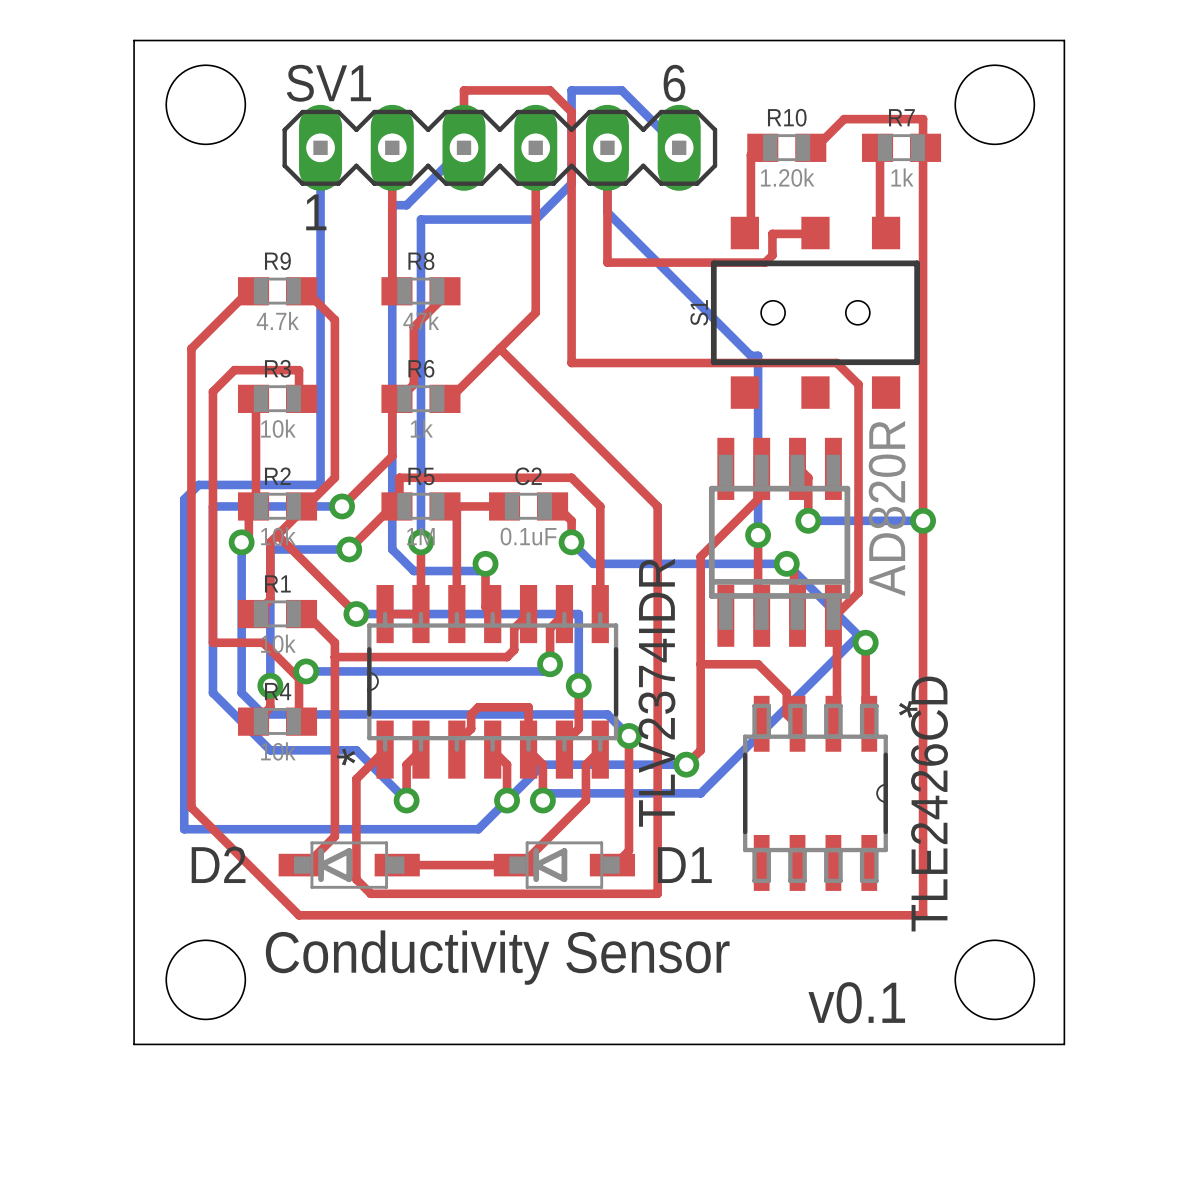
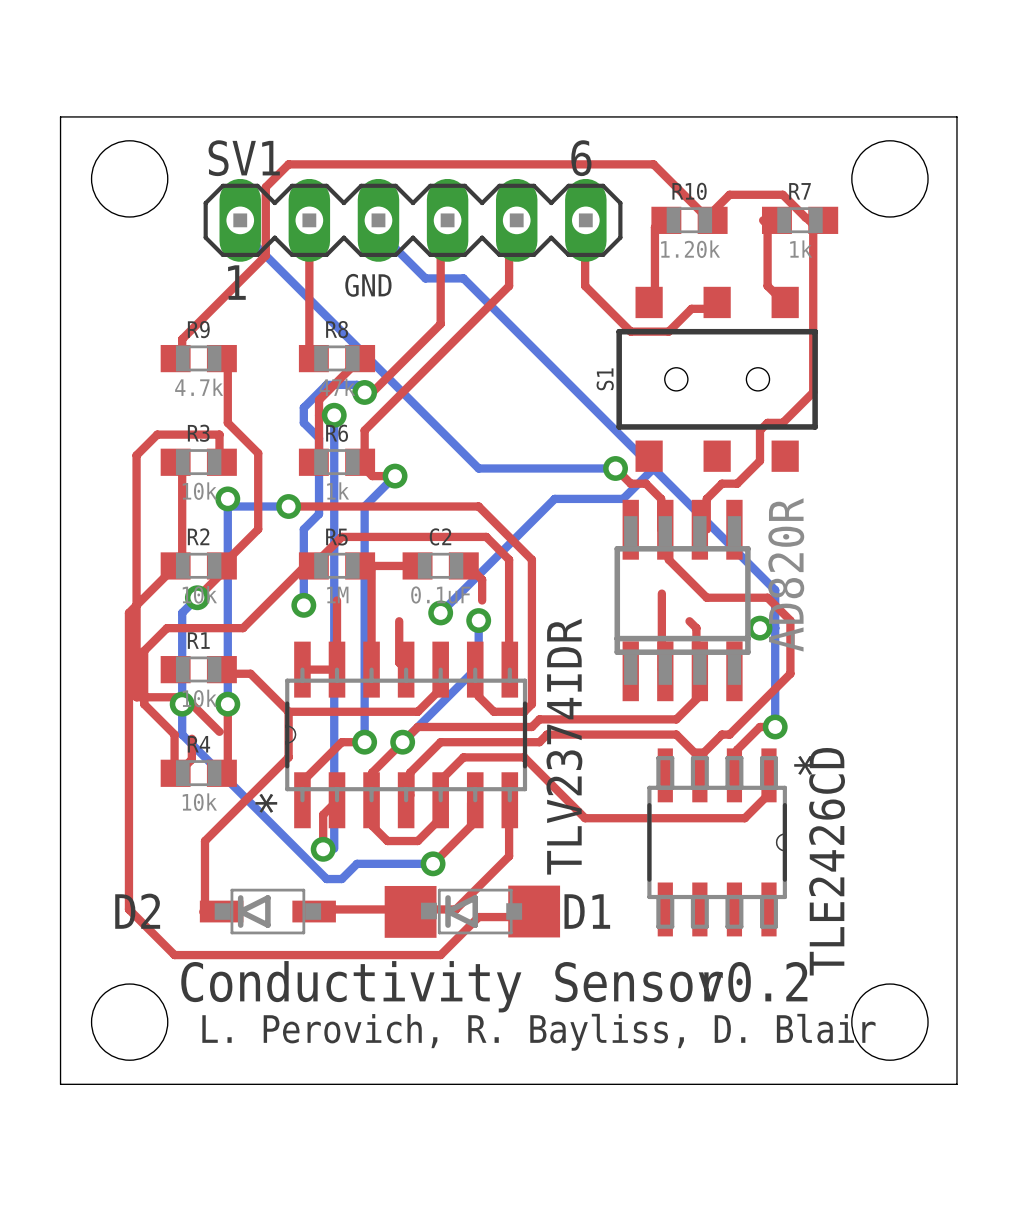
bottom track: none -> (233, 220) (235, 225) (478, 468) (615, 468)
bottom track: (320, 147) (320, 484) (198, 484) (184, 499) (184, 829) (478, 829) (542, 764) (686, 764) -> none
bottom track: none -> (371, 220) (372, 225) (425, 278) (463, 278) (775, 590) (775, 726)
top track: (464, 147) (464, 90) (550, 90) (571, 111) (571, 363) (836, 363) (858, 384) (858, 592) (833, 615) (836, 621) (836, 721) (833, 723) -> (775, 726) (760, 726) (737, 749) (737, 772) (734, 775)
bottom track: (464, 147) (406, 205) (392, 205) (392, 549) (413, 571) (478, 571) (485, 563) -> none
top track: none -> (440, 220) (440, 324) (372, 392) (364, 392)
top track: (535, 147) (535, 312) (449, 398) (444, 398) -> none
top track: none -> (509, 220) (509, 286) (364, 430) (364, 460) (360, 462) (372, 476) (395, 476)
top track: (607, 147) (607, 262) (765, 262) (772, 255) (772, 233) (815, 233) -> (578, 220) (585, 225) (585, 286) (630, 331) (668, 331) (691, 308) (714, 308) (717, 302)
bottom track: (607, 147) (607, 212) (750, 355) (758, 355) (758, 535) -> none
bottom track: (679, 147) (621, 90) (571, 90) (571, 183) (535, 219) (420, 219) (420, 542) -> none
top track: (810, 147) (815, 147) (844, 119) (923, 119) (923, 915) (299, 915) (191, 807) (191, 348) (248, 291) (253, 291) -> (706, 217) (653, 164) (288, 164) (265, 187) (265, 255) (182, 339) (182, 354) (175, 358)
top track: (877, 147) (880, 147) (880, 226) (886, 233) -> (763, 220) (767, 225) (767, 286) (785, 302)
text: none -> GND (368, 285)
top track: (301, 291) (306, 291) (334, 319) (334, 477) (306, 506) (299, 506) (299, 513) (270, 542) (270, 599) (256, 614) (253, 614) -> (221, 358) (227, 362) (227, 422) (258, 453) (258, 529) (221, 565) (227, 567) (197, 597)
top track: (444, 291) (442, 291) (442, 298) (413, 327) (413, 384) (399, 398) (392, 398) (392, 456) (342, 506) -> (360, 358) (319, 400) (319, 460) (313, 462)
bottom track: none -> (364, 392) (357, 384) (326, 384) (303, 407) (303, 422) (319, 438) (319, 514) (303, 529) (303, 605)
via: none -> (364, 392)
top track: (499, 348) (657, 506) (657, 893) (370, 893) (356, 879) (356, 779) (385, 749) -> (364, 742) (341, 742) (303, 780) (302, 800)
bottom track: none -> (334, 415) (334, 848)
via: none -> (334, 415)
top track: (253, 398) (256, 398) (256, 506) (248, 506) (248, 535) (241, 542) -> (175, 462) (182, 468) (182, 559) (128, 612) (128, 909) (174, 955) (440, 955) (478, 917) (531, 917) (534, 911)
top track: none -> (615, 468) (630, 483) (645, 483) (661, 498) (661, 529) (665, 529) (668, 536) (668, 559) (706, 597) (767, 597) (790, 620) (790, 673) (729, 734) (721, 734) (699, 757)
via: none -> (615, 468)
bottom track: none -> (653, 468) (623, 498) (554, 498) (440, 612)
bottom track: none -> (395, 476) (364, 506) (364, 742)
via: none -> (395, 476)
bottom track: none -> (227, 498) (227, 704)
via: none -> (227, 498)
bottom track: none -> (227, 506) (288, 506)
via: none -> (288, 506)
top track: (761, 468) (758, 470) (758, 499) (700, 556) (700, 750) (686, 764) -> none
top track: (797, 468) (808, 477) (808, 520) -> (699, 529) (706, 529) (706, 498) (721, 483) (737, 483) (760, 460) (760, 430) (767, 422) (782, 422) (813, 392) (813, 225) (782, 194) (729, 194) (706, 217)
bottom track: (342, 506) (212, 506) (212, 692) (270, 750) (356, 750) (406, 800) -> none
via: (342, 506) -> none
bottom track: (808, 520) (923, 520) -> none
via: (808, 520) -> none
via: (923, 520) -> none
top track: (277, 535) (356, 614) -> none
via: (758, 535) -> none
bottom track: none -> (197, 597) (182, 612) (182, 734) (326, 879) (341, 879) (357, 863) (433, 863)
bottom track: (241, 542) (241, 692) (263, 714) (607, 714) (628, 735) -> none
via position: (241, 542) -> (197, 597)
via: (420, 542) -> none
bottom track: (571, 542) (593, 563) (786, 563) (865, 642) -> none
via position: (571, 542) -> (478, 620)
via: none -> (303, 605)
top track: (349, 549) (392, 506) (399, 506) (399, 477) (571, 477) (600, 506) (600, 614) -> (175, 773) (174, 734) (144, 704) (144, 650) (166, 628) (243, 628) (311, 559) (313, 565) (341, 536) (486, 536) (509, 559) (509, 669)
bottom track: (349, 549) (270, 549) (270, 685) -> none
via: (349, 549) -> none
via: none -> (440, 612)
via: (485, 563) -> none
bottom track: none -> (478, 620) (478, 666) (402, 742)
via: (786, 563) -> none
via: none -> (760, 628)
top track: (301, 614) (306, 614) (334, 642) (334, 836) (306, 865) (301, 865) -> (221, 669) (227, 673) (250, 673) (288, 711)
bottom track: (356, 614) (578, 614) (578, 685) -> none
via: (356, 614) -> none
top track: (528, 614) (514, 628) (514, 649) (507, 657) (334, 657) -> (440, 669) (440, 688) (417, 711) (288, 711)
top track: (564, 614) (550, 628) (550, 664) -> (475, 669) (478, 673) (478, 696) (493, 711) (524, 711) (531, 704) (531, 559) (478, 506) (288, 506)
bottom track: (858, 635) (700, 793) (550, 793) (542, 800) -> none
top track: (865, 642) (865, 721) (869, 723) -> (440, 780) (463, 757) (524, 757) (585, 818) (744, 818) (767, 795) (768, 775)
via position: (865, 642) -> (775, 726)
via: none -> (182, 704)
top track: none -> (288, 711) (288, 757) (204, 841) (204, 909) (203, 911)
bottom track: (550, 664) (542, 671) (306, 671) -> none
via: (550, 664) -> none
top track: (700, 664) (758, 664) (786, 692) (786, 714) (797, 723) -> none
top track: (306, 671) (299, 678) (299, 721) (301, 721) -> (227, 704) (227, 772) (221, 773)
via position: (306, 671) -> (227, 704)
via: (270, 685) -> none
top track: (578, 685) (578, 728) (564, 743) (564, 749) -> (433, 863) (471, 825) (471, 803) (475, 800)
via: (578, 685) -> none
via: none -> (364, 742)
via: none -> (402, 742)
top track: (528, 728) (528, 707) (478, 707) (471, 714) (471, 728) (456, 743) (456, 749) -> none
top track: (628, 735) (628, 850) (612, 865) -> none
via: (628, 735) -> none
top track: (492, 749) (507, 764) (507, 800) -> (406, 800) (410, 795) (410, 772) (440, 742) (539, 742) (547, 734) (676, 734) (699, 757)
top track: (600, 749) (585, 764) (585, 800) (521, 865) (397, 865) -> (509, 800) (509, 856) (455, 909) (417, 909) (410, 911) (410, 909) (334, 909) (326, 911)
top track: (528, 750) (542, 764) (542, 800) -> (440, 800) (440, 818) (417, 841) (387, 841) (372, 825) (372, 772) (417, 726) (531, 726) (539, 719) (676, 719) (699, 696) (699, 671)
via: (686, 764) -> none
via: (507, 800) -> none
via: (542, 800) -> none
via: none -> (433, 863)
D1 footprint: [493, 841, 636, 889] -> [384, 885, 561, 938]
text position: Conductivity Sensor (497, 957) -> Conductivity Sensor (452, 986)
text: none -> L. Perovich, R. Bayliss, D. Blair (538, 1032)
text: v0.1 (856, 1002) -> v0.2 (753, 982)

